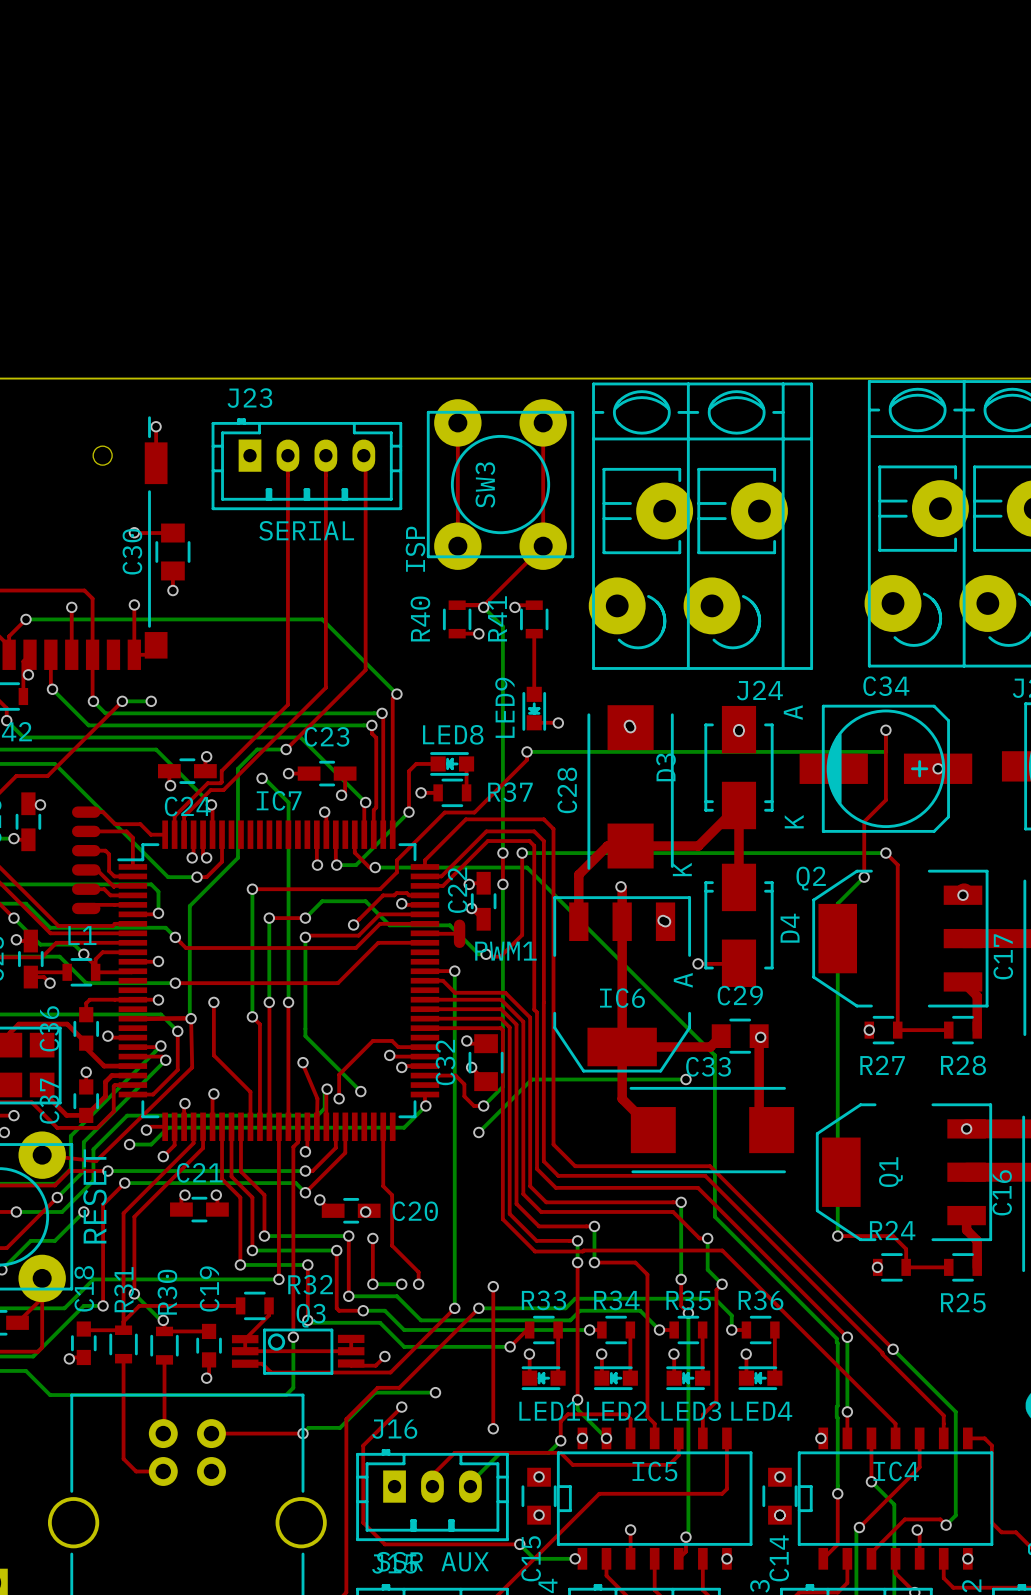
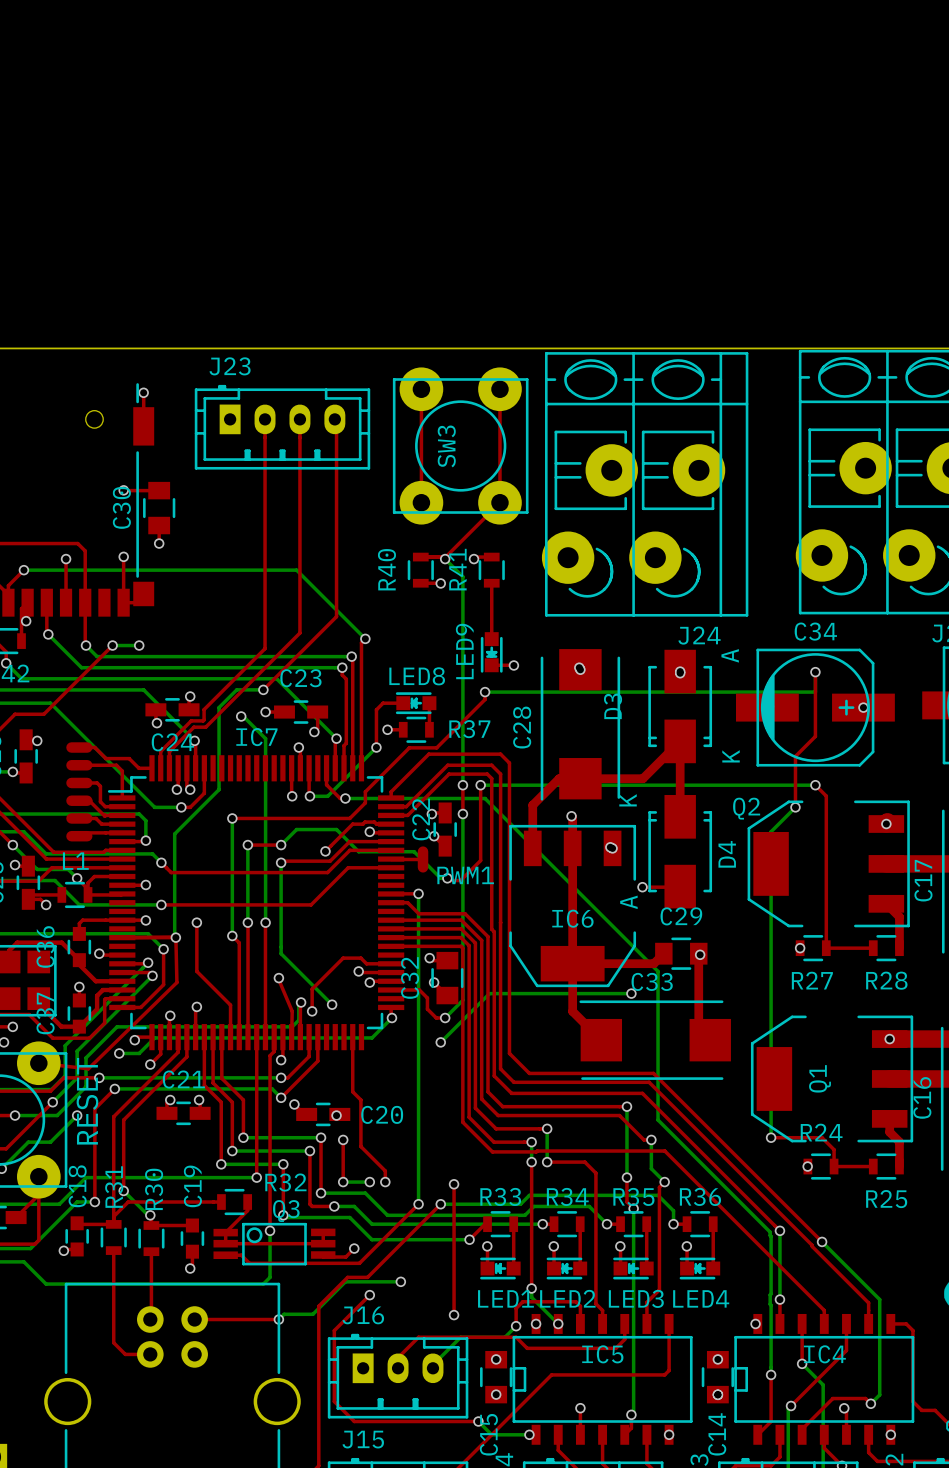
J23 value: SERIAL (306, 530) -> none
SW3 value: ISP (415, 549) -> none
J16 value: SSR AUX (432, 1561) -> none

